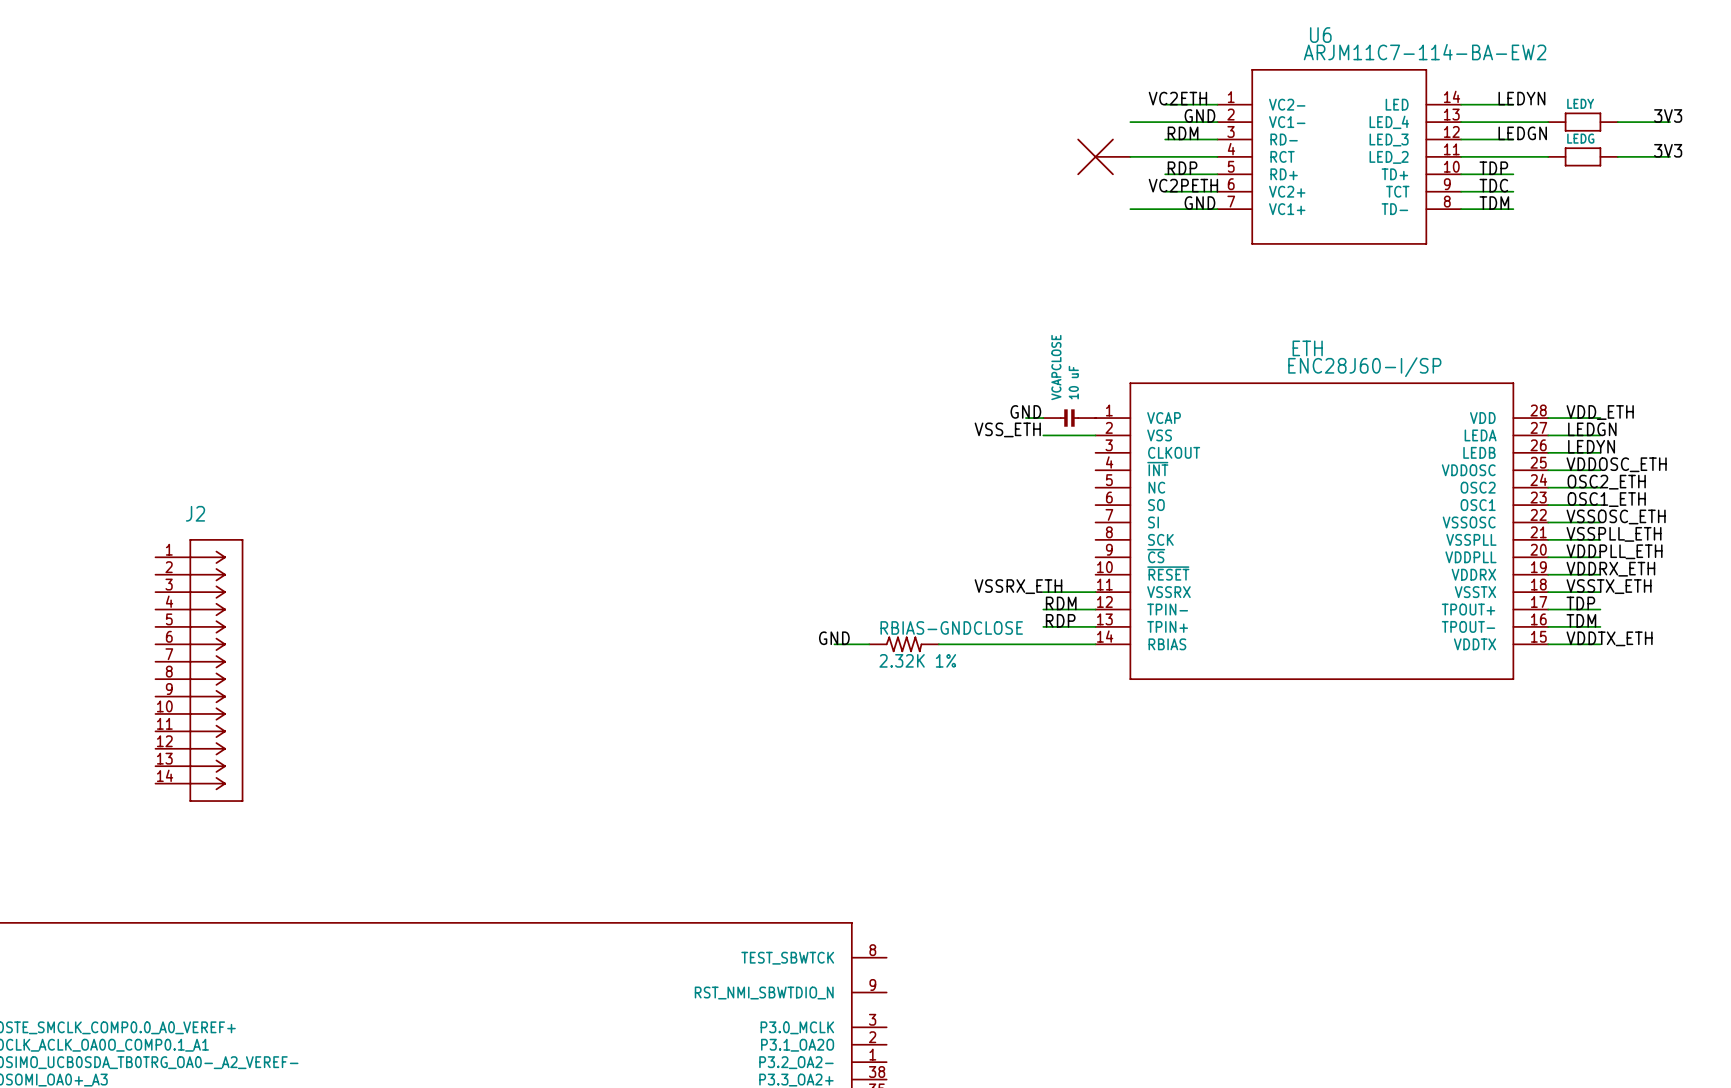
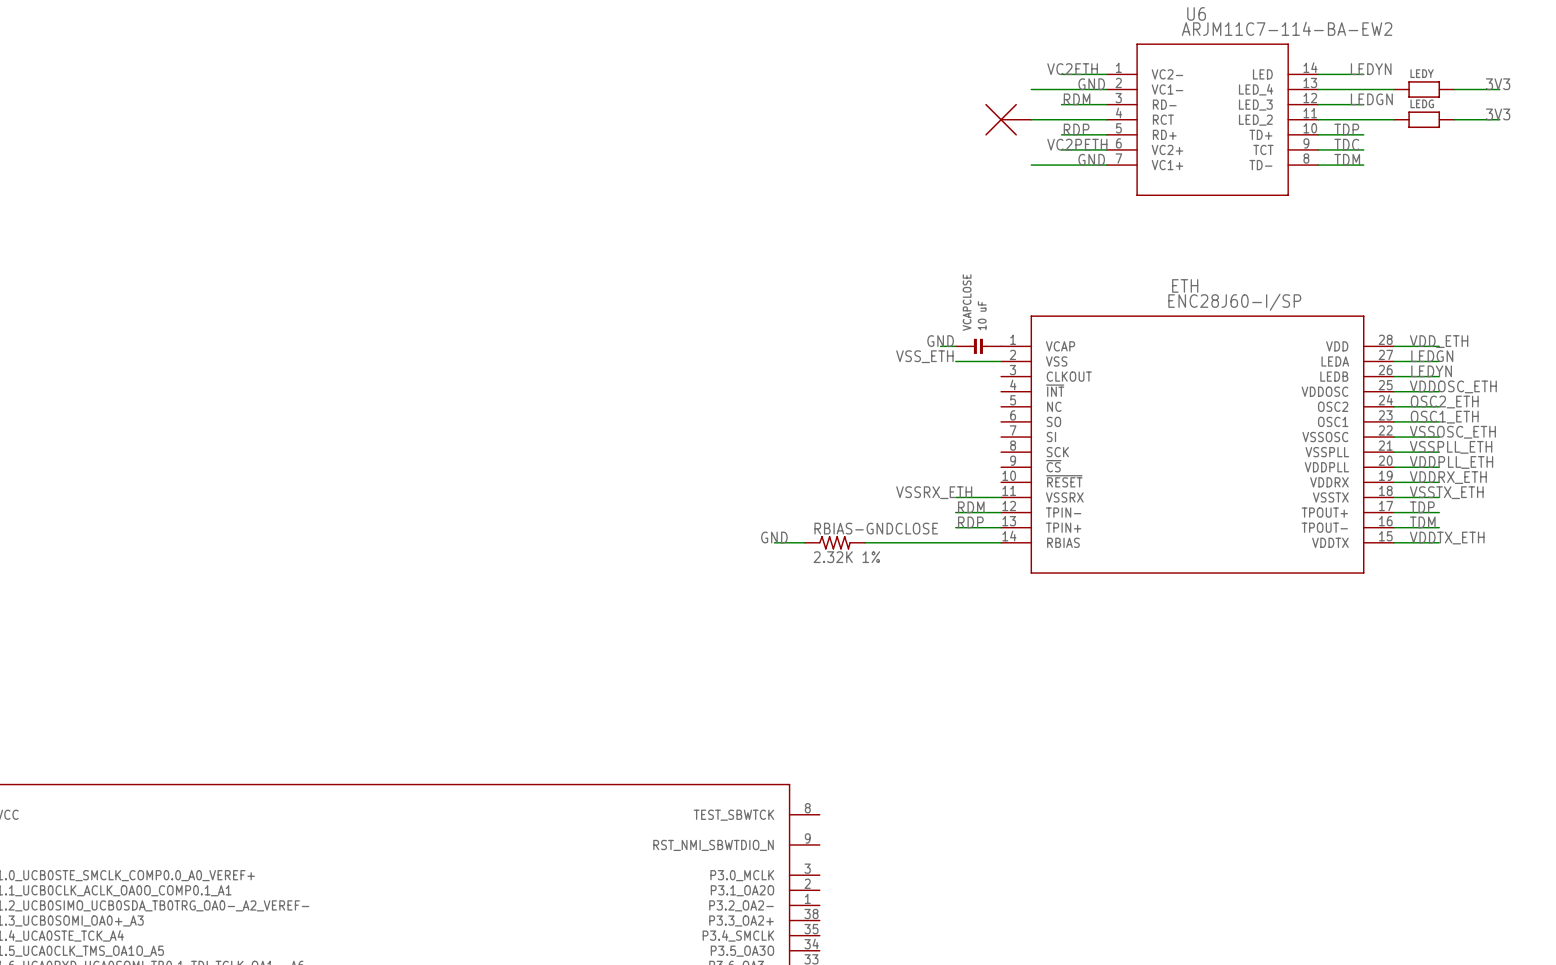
J2: (199, 670) -> none

